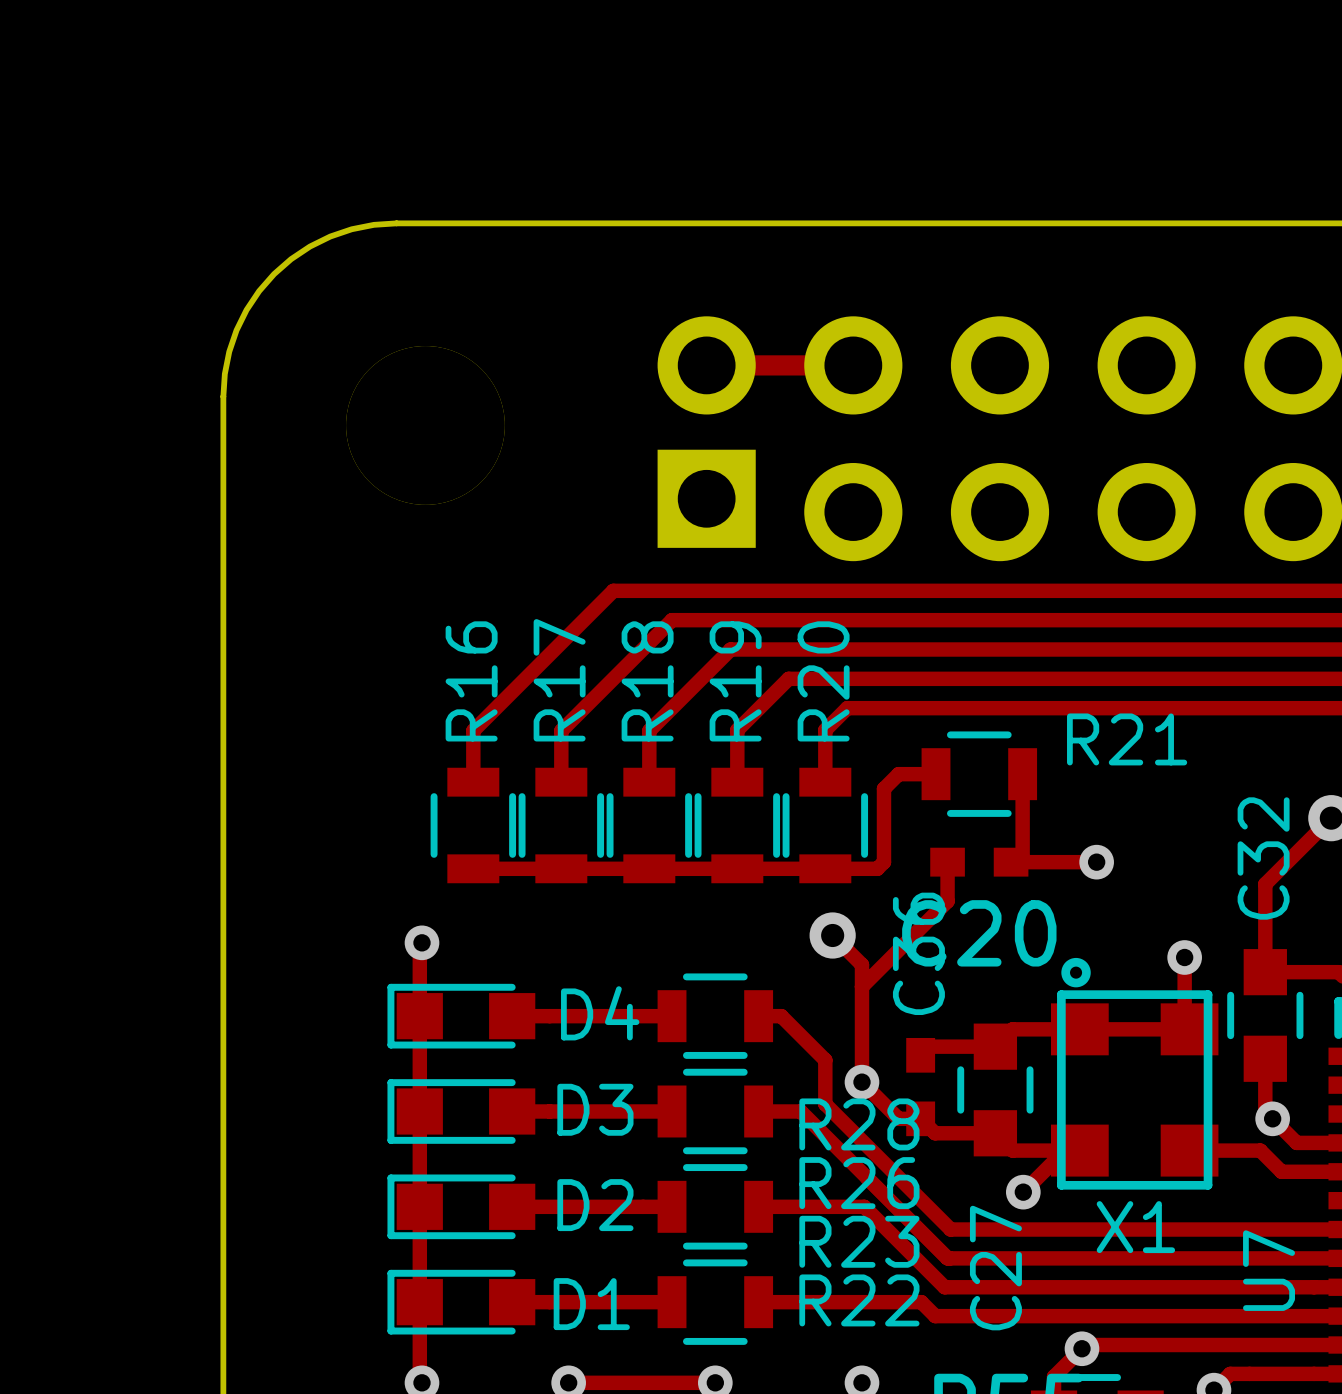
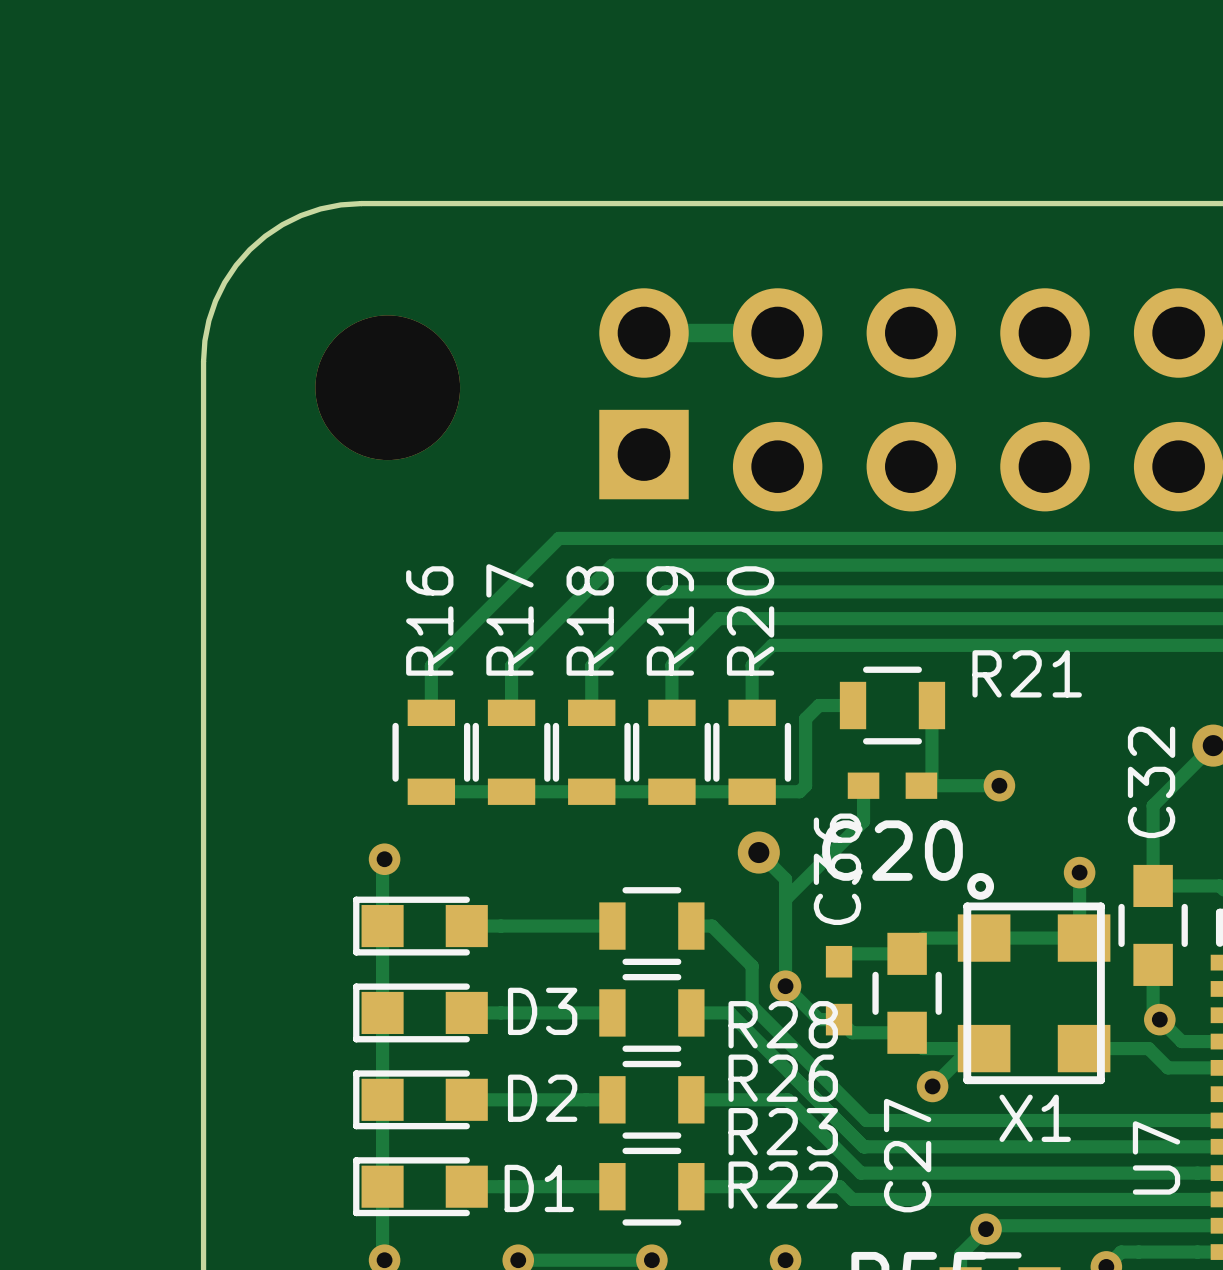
D4 name: D4 (600, 1013) -> none

